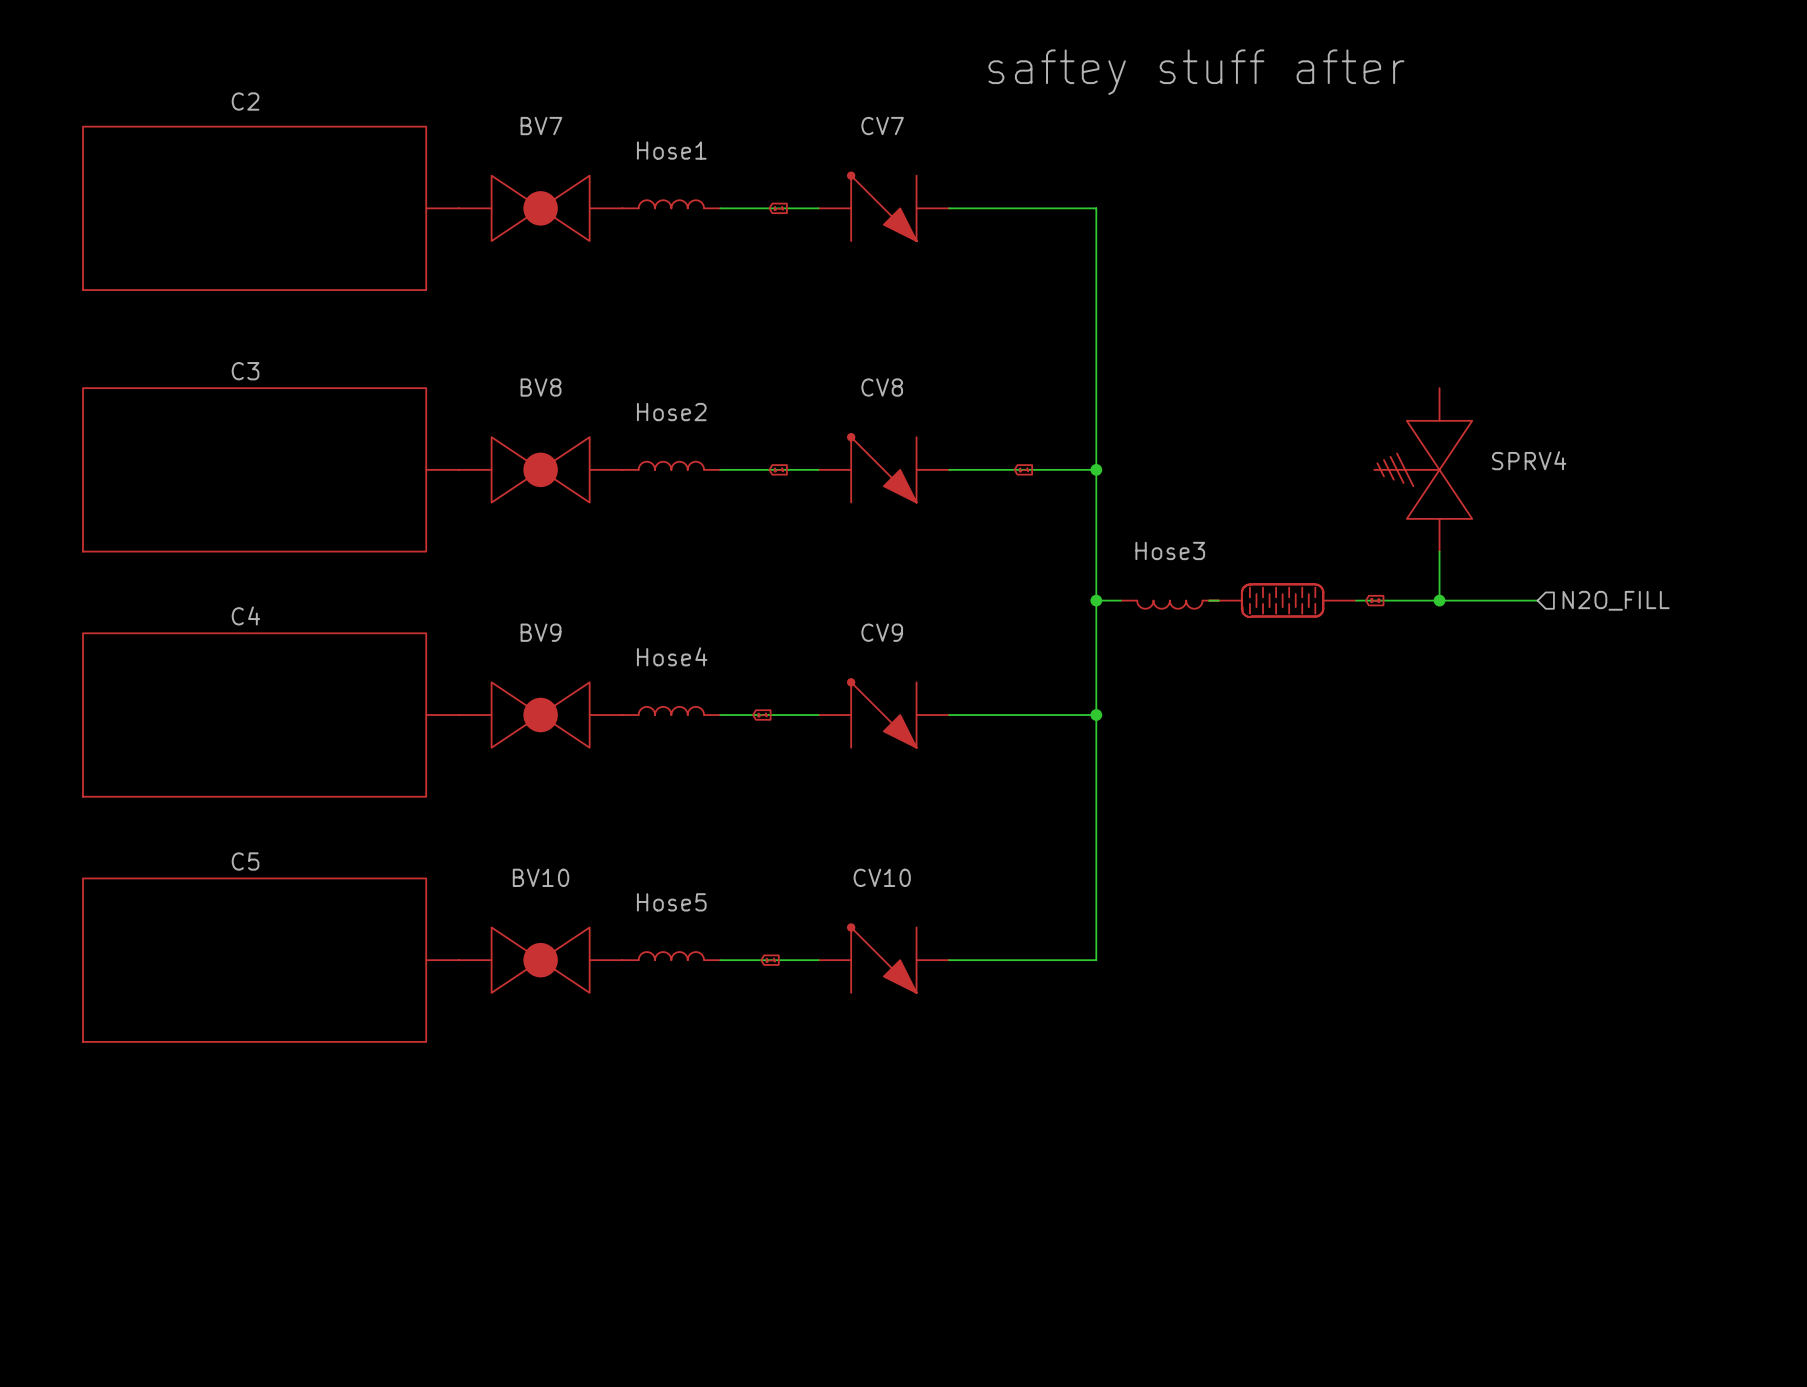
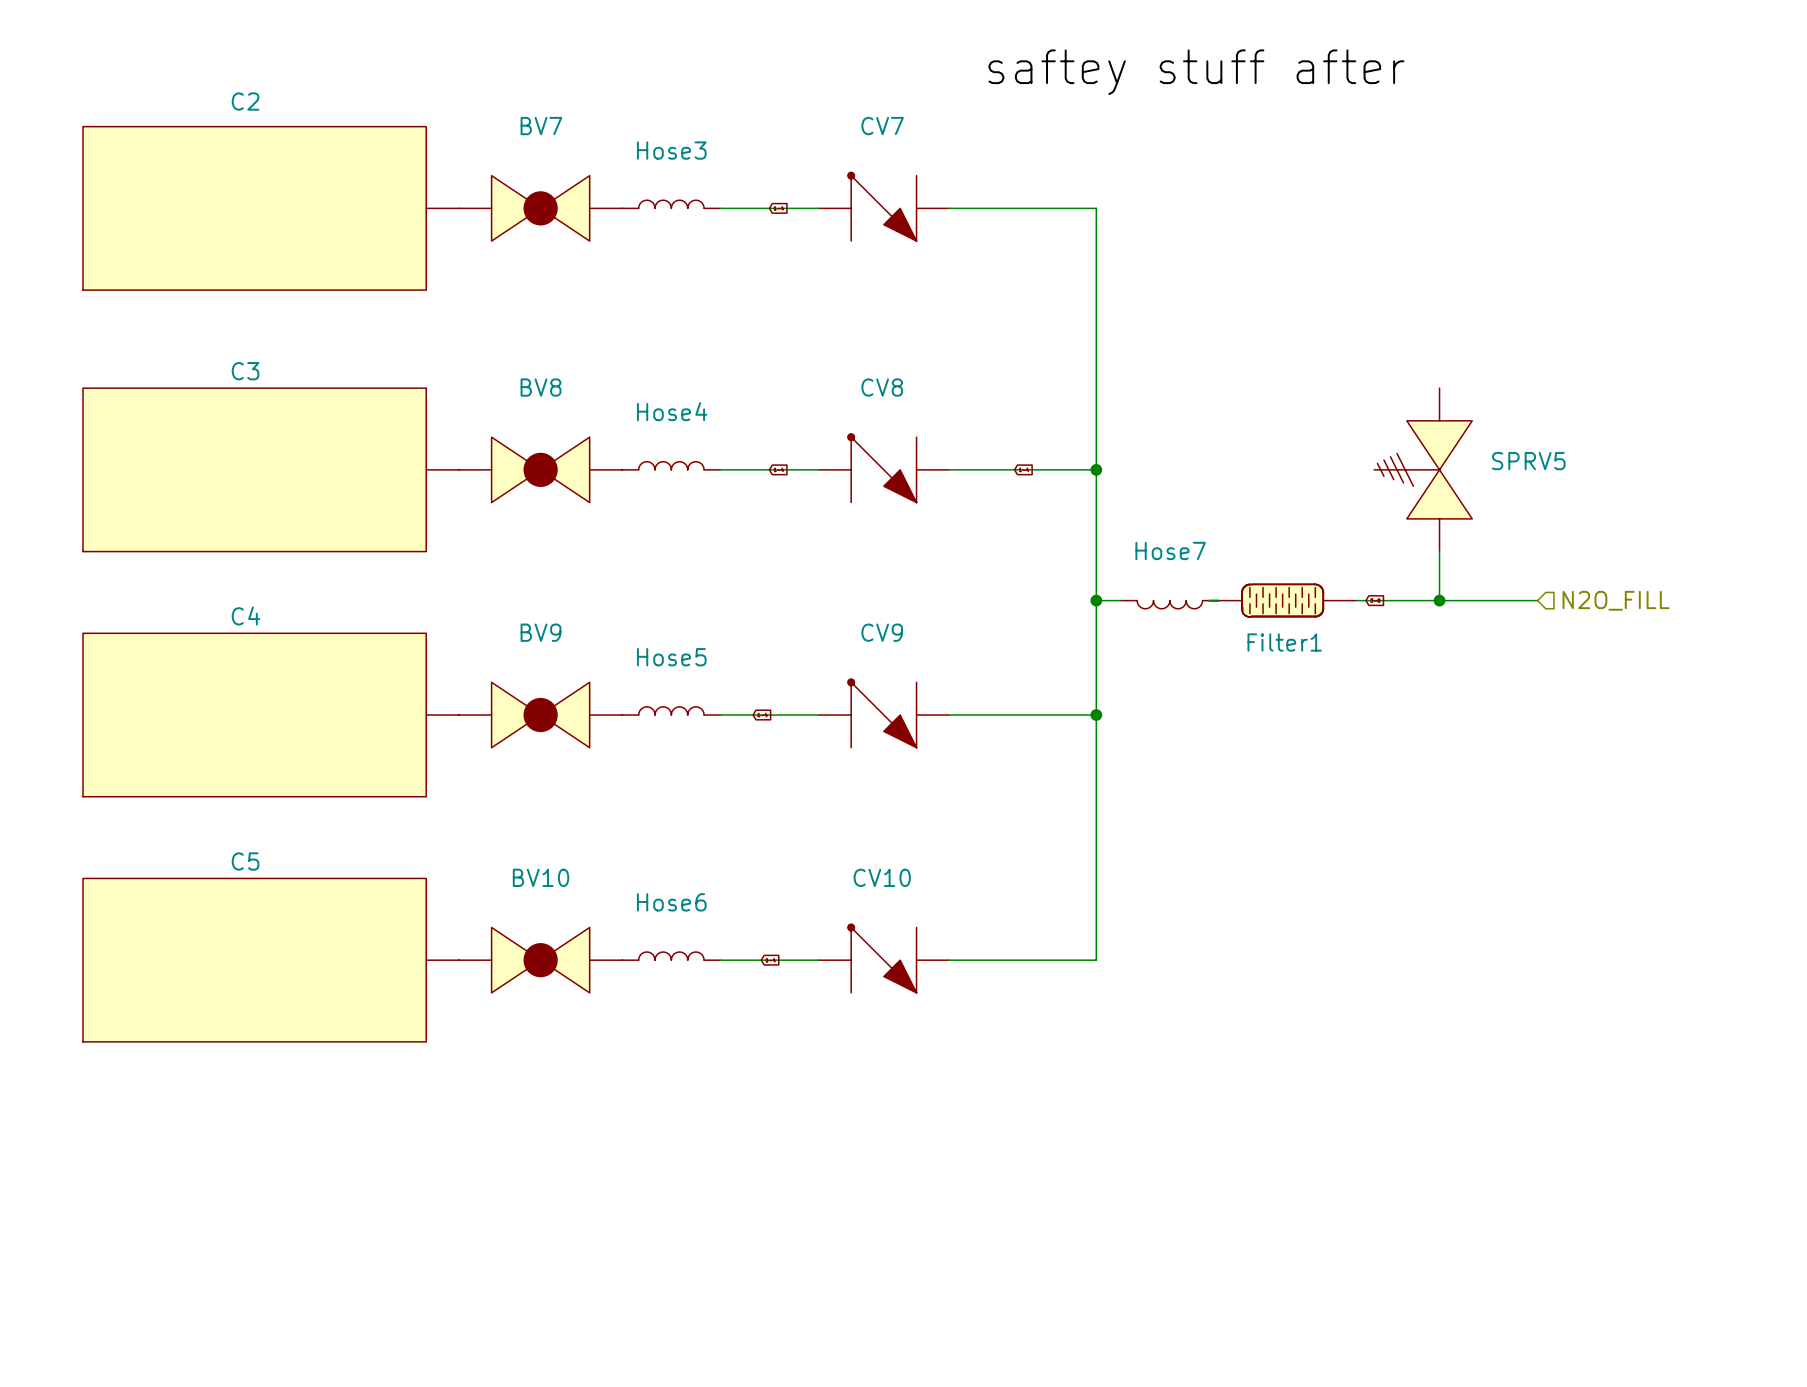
Hose1 name: Hose1 (671, 150) -> Hose3 (671, 150)
Hose2 name: Hose2 (671, 412) -> Hose4 (672, 411)
SPRV4 name: SPRV4 (1529, 460) -> SPRV5 (1528, 461)
Hose3 name: Hose3 (1170, 550) -> Hose7 (1170, 550)
Filter1 name: none -> Filter1 (1284, 642)
Hose4 name: Hose4 (672, 656) -> Hose5 (671, 657)
Hose5 name: Hose5 (671, 902) -> Hose6 (671, 902)

